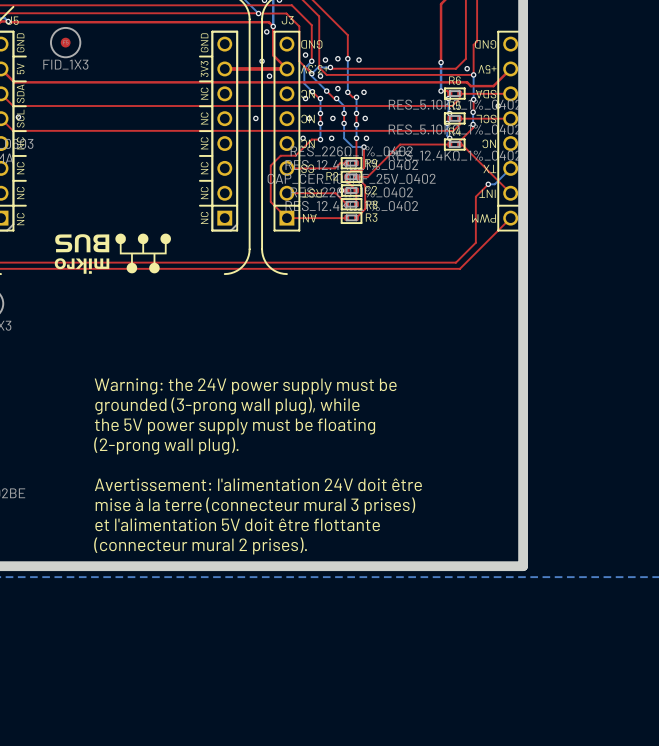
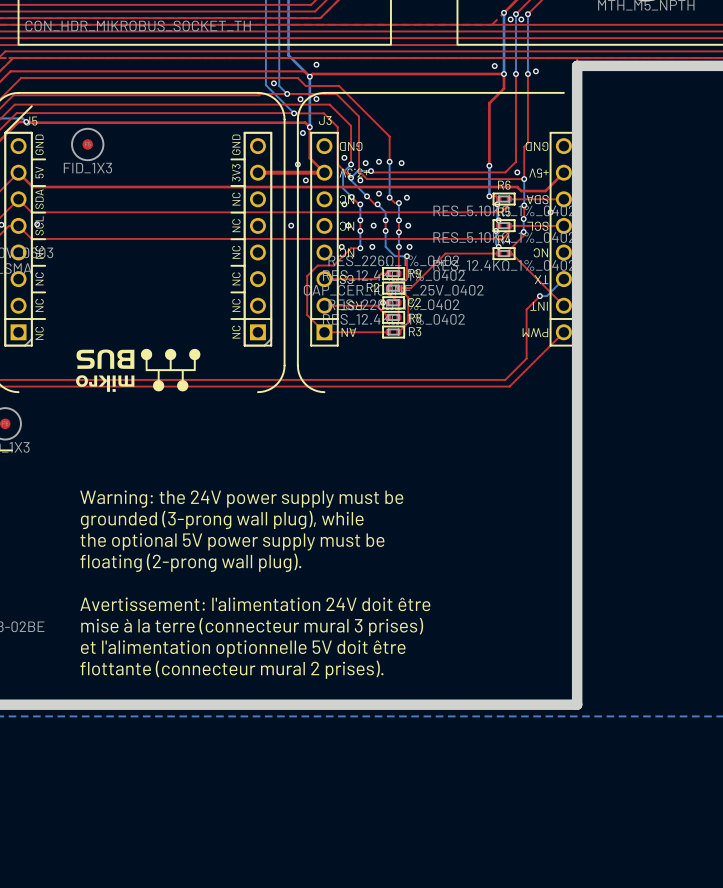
text position: Warning: the 24V power supply must be (245, 386) -> Warning: the 24V power supply must be (241, 499)
text position: grounded (3-prong wall plug), while (227, 405) -> grounded (3-prong wall plug), while (222, 519)
text: the 5V power supply must be floating (234, 426) -> the optional 5V power supply must be (232, 541)
text: (2-prong wall plug). (166, 445) -> floating (2-prong wall plug). (190, 562)
text position: Avertissement: l'alimentation 24V doit être (258, 484) -> Avertissement: l'alimentation 24V doit être (255, 604)
text position: mise à la terre (connecteur mural 3 prises) (255, 505) -> mise à la terre (connecteur mural 3 prises) (252, 626)
text: et l'alimentation 5V doit être flottante (237, 524) -> et l'alimentation optionnelle 5V doit être (243, 648)
text: (connecteur mural 2 prises). (200, 546) -> flottante (connecteur mural 2 prises). (231, 669)

